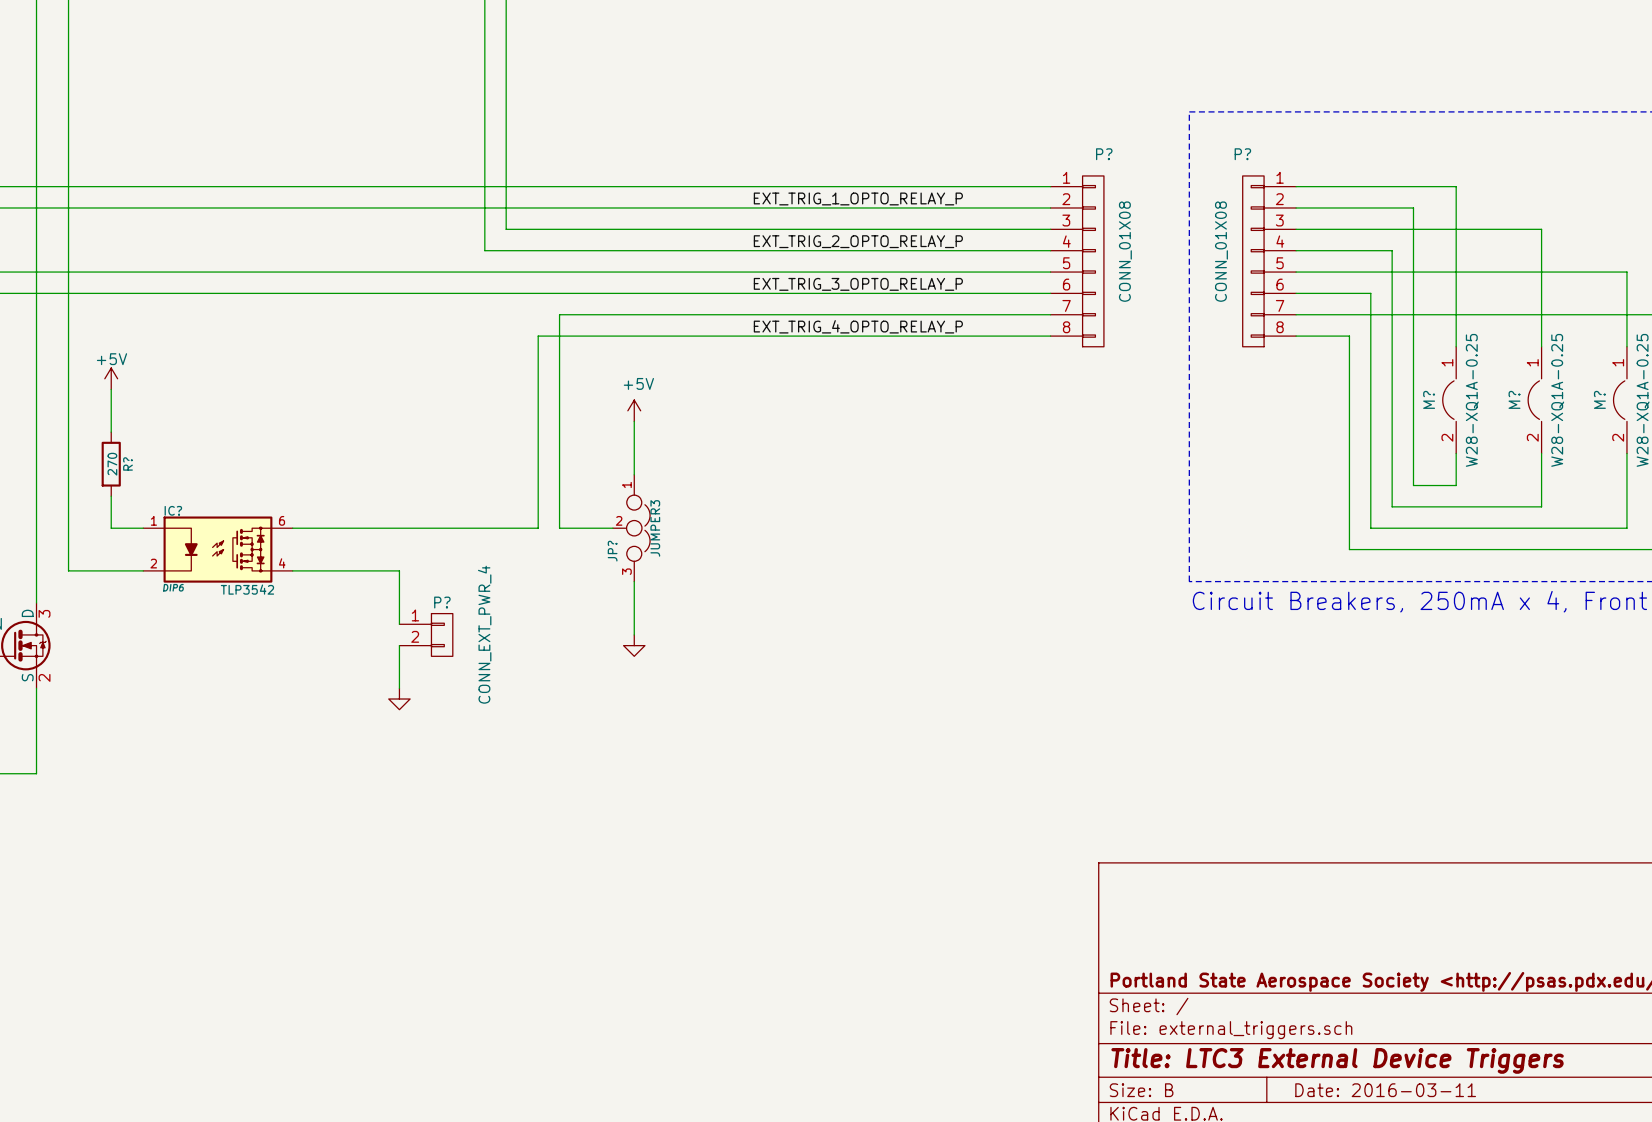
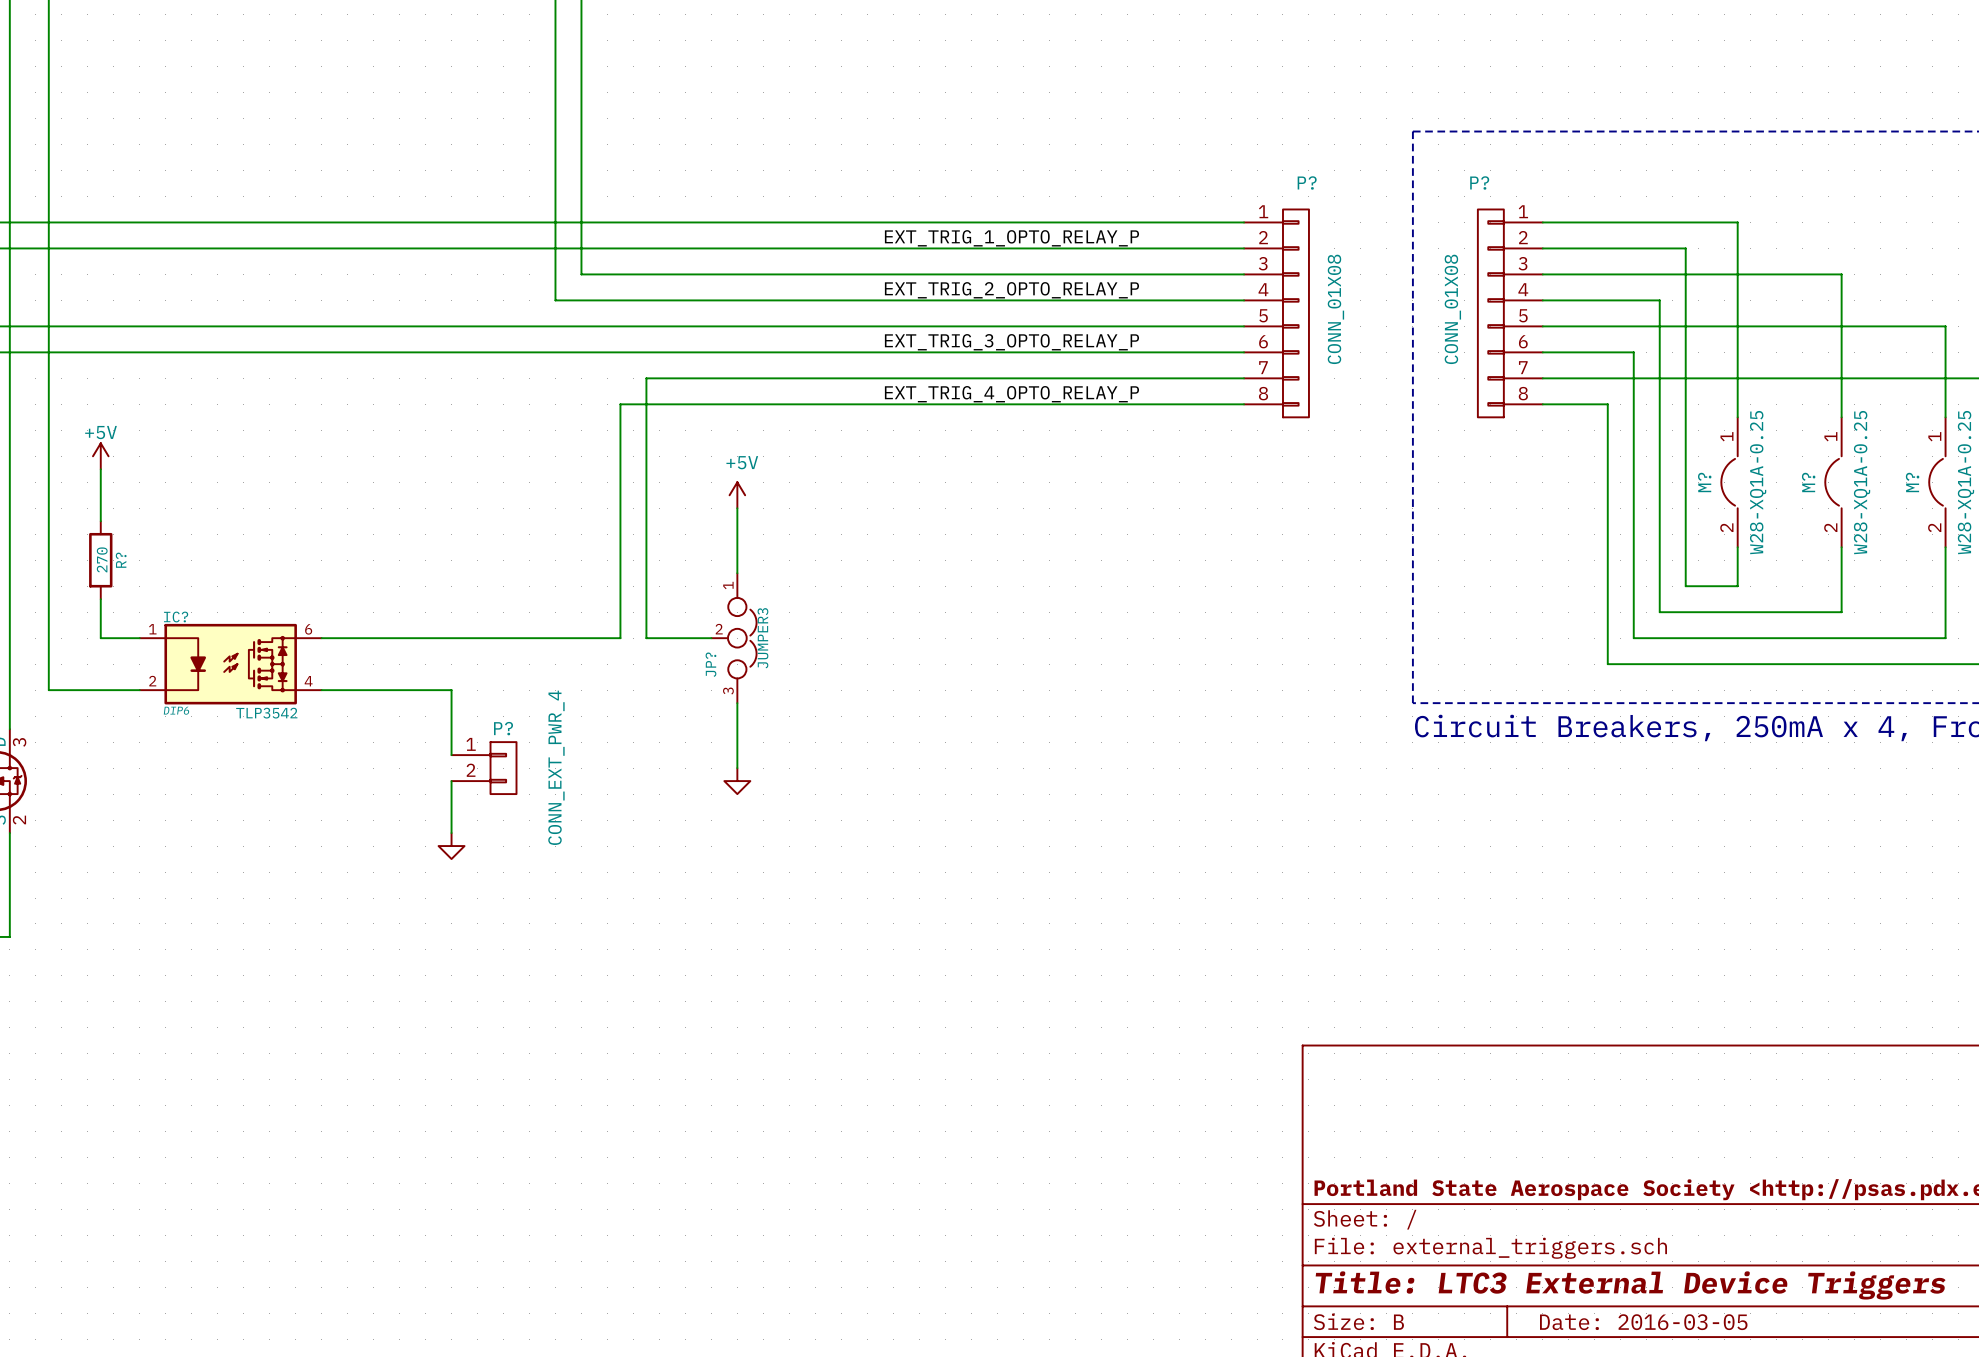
title block: Date: 2016-03-11 (1385, 1090) -> Date: 2016-03-05 (1643, 1322)

